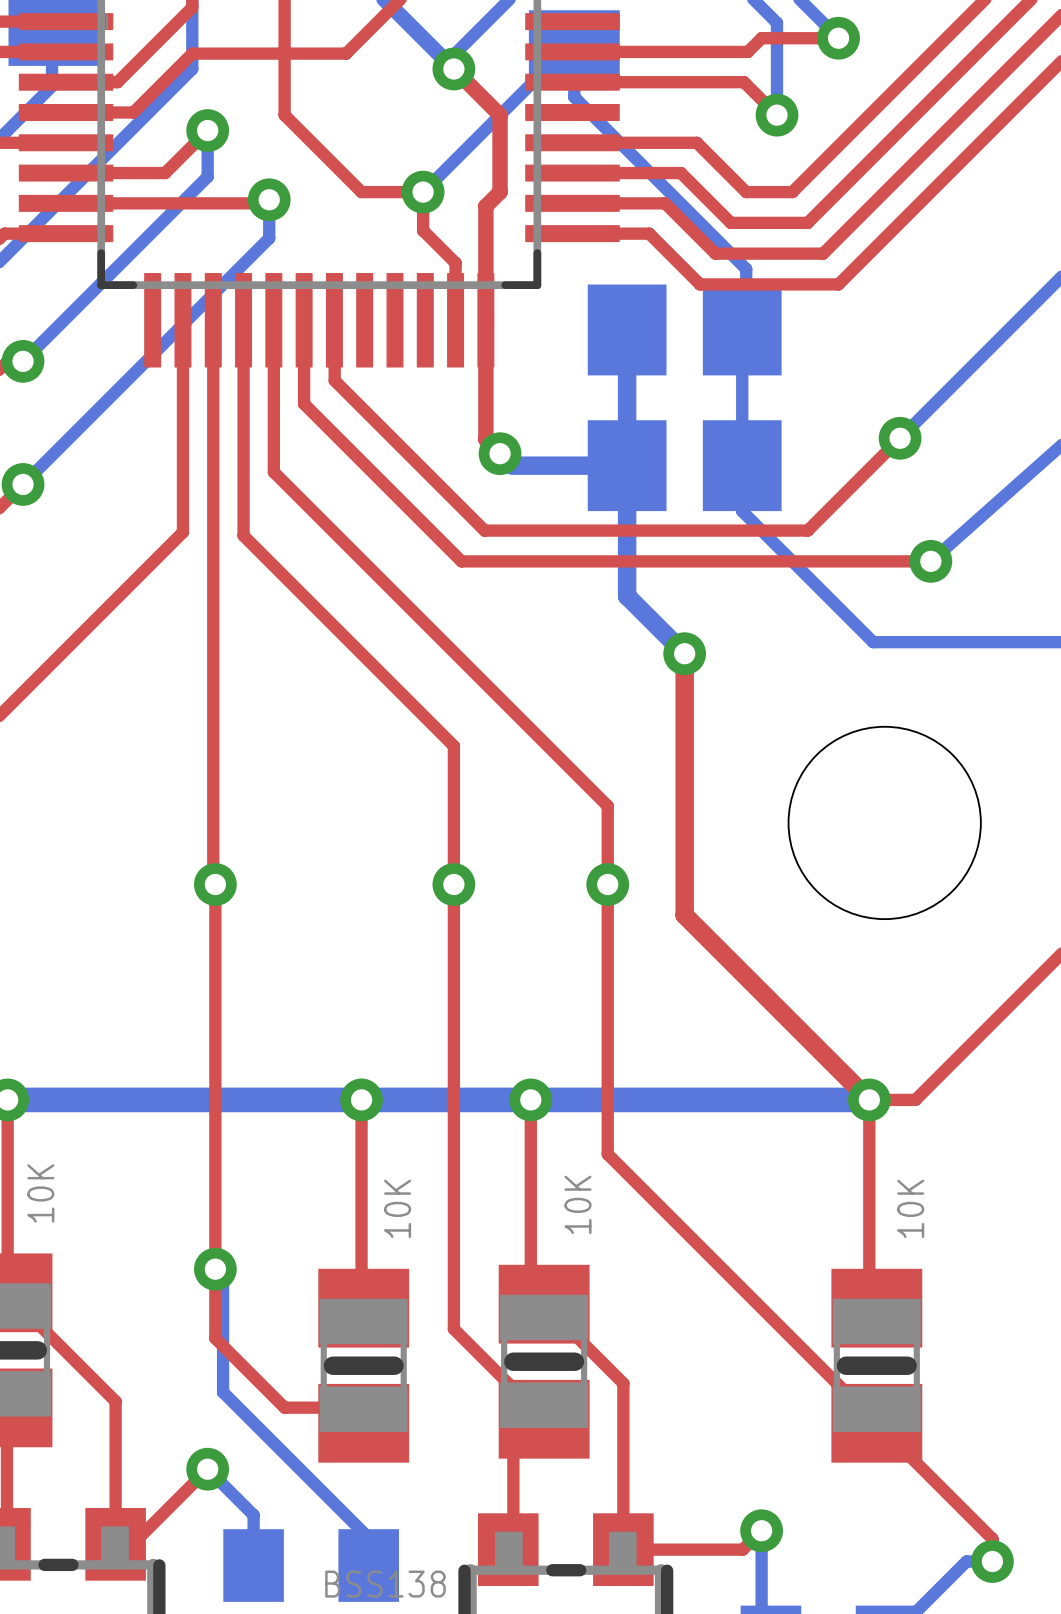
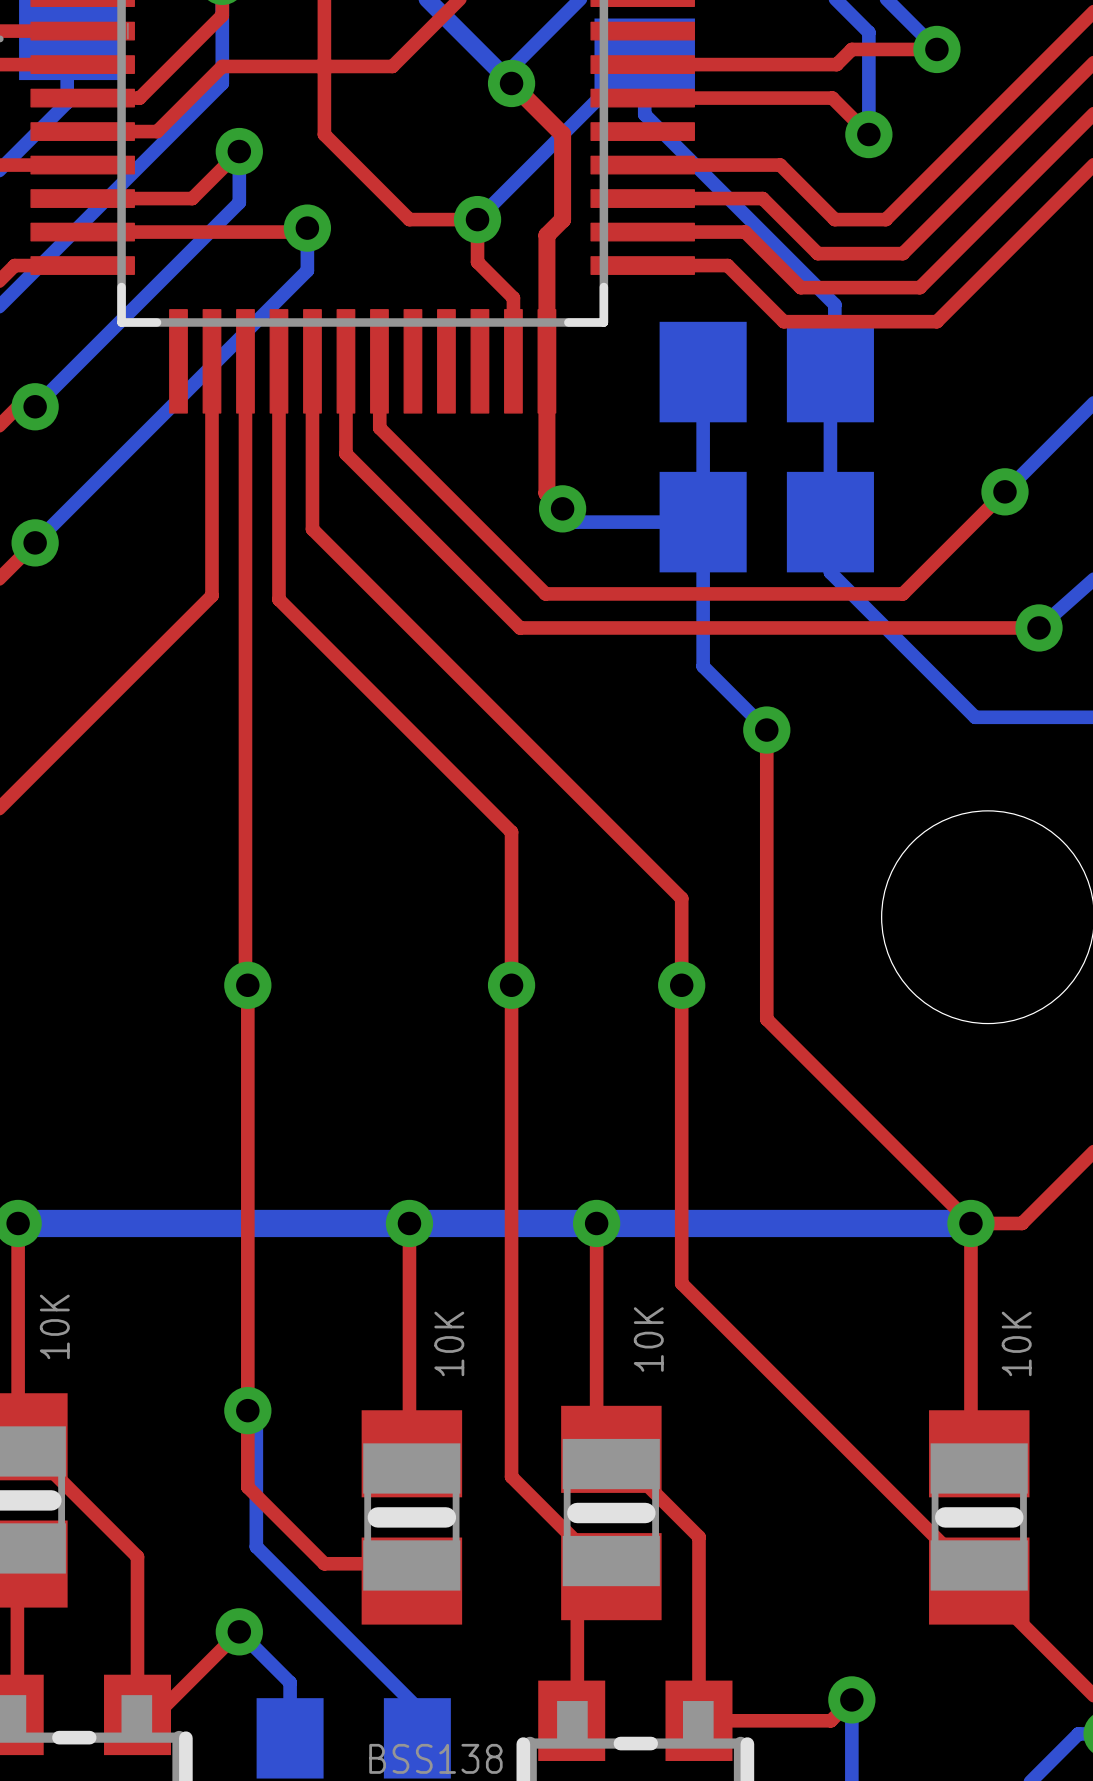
bottom track width: thick (627, 329) (627, 596) (684, 653) -> thin (703, 372) (703, 666) (766, 730)
bottom track width: thick (512, 465) (627, 465) -> thin (575, 522) (703, 522)
top track width: thick (684, 653) (684, 915) (869, 1099) -> thin (766, 730) (766, 1019) (970, 1223)

